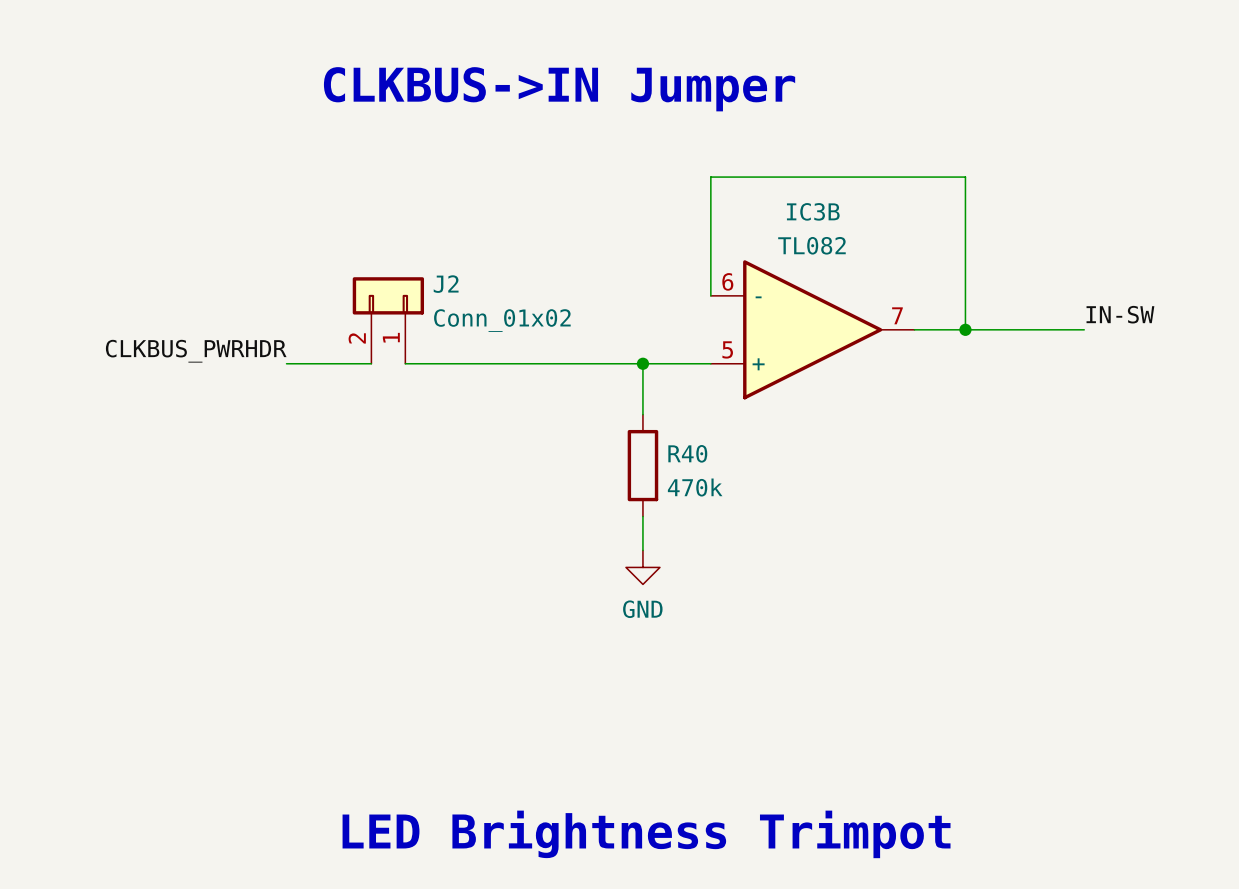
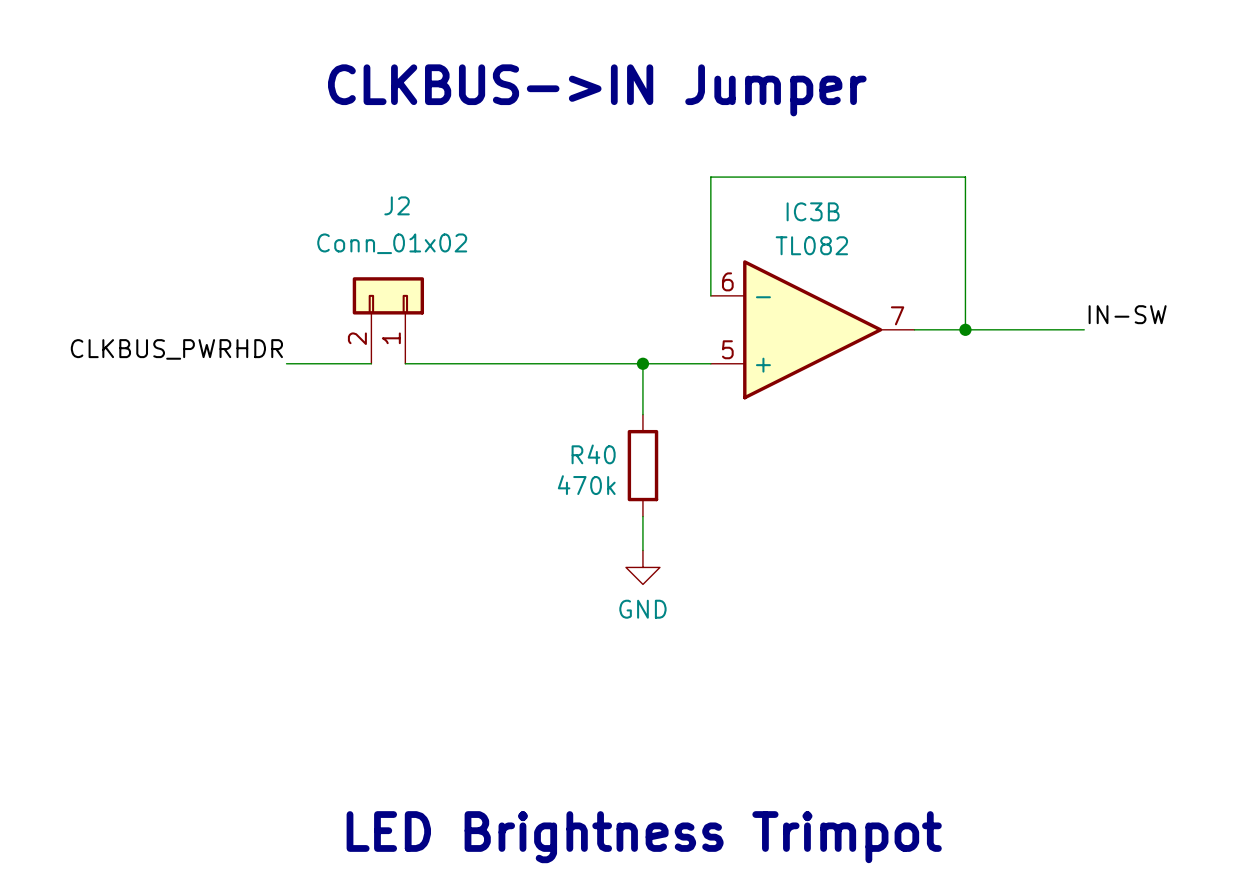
J2 name position: J2 (446, 284) -> J2 (397, 205)
J2 value position: Conn_01x02 (502, 320) -> Conn_01x02 (392, 243)
R40 name position: R40 (687, 453) -> R40 (593, 454)
R40 text position: 470k (695, 487) -> 470k (586, 485)

